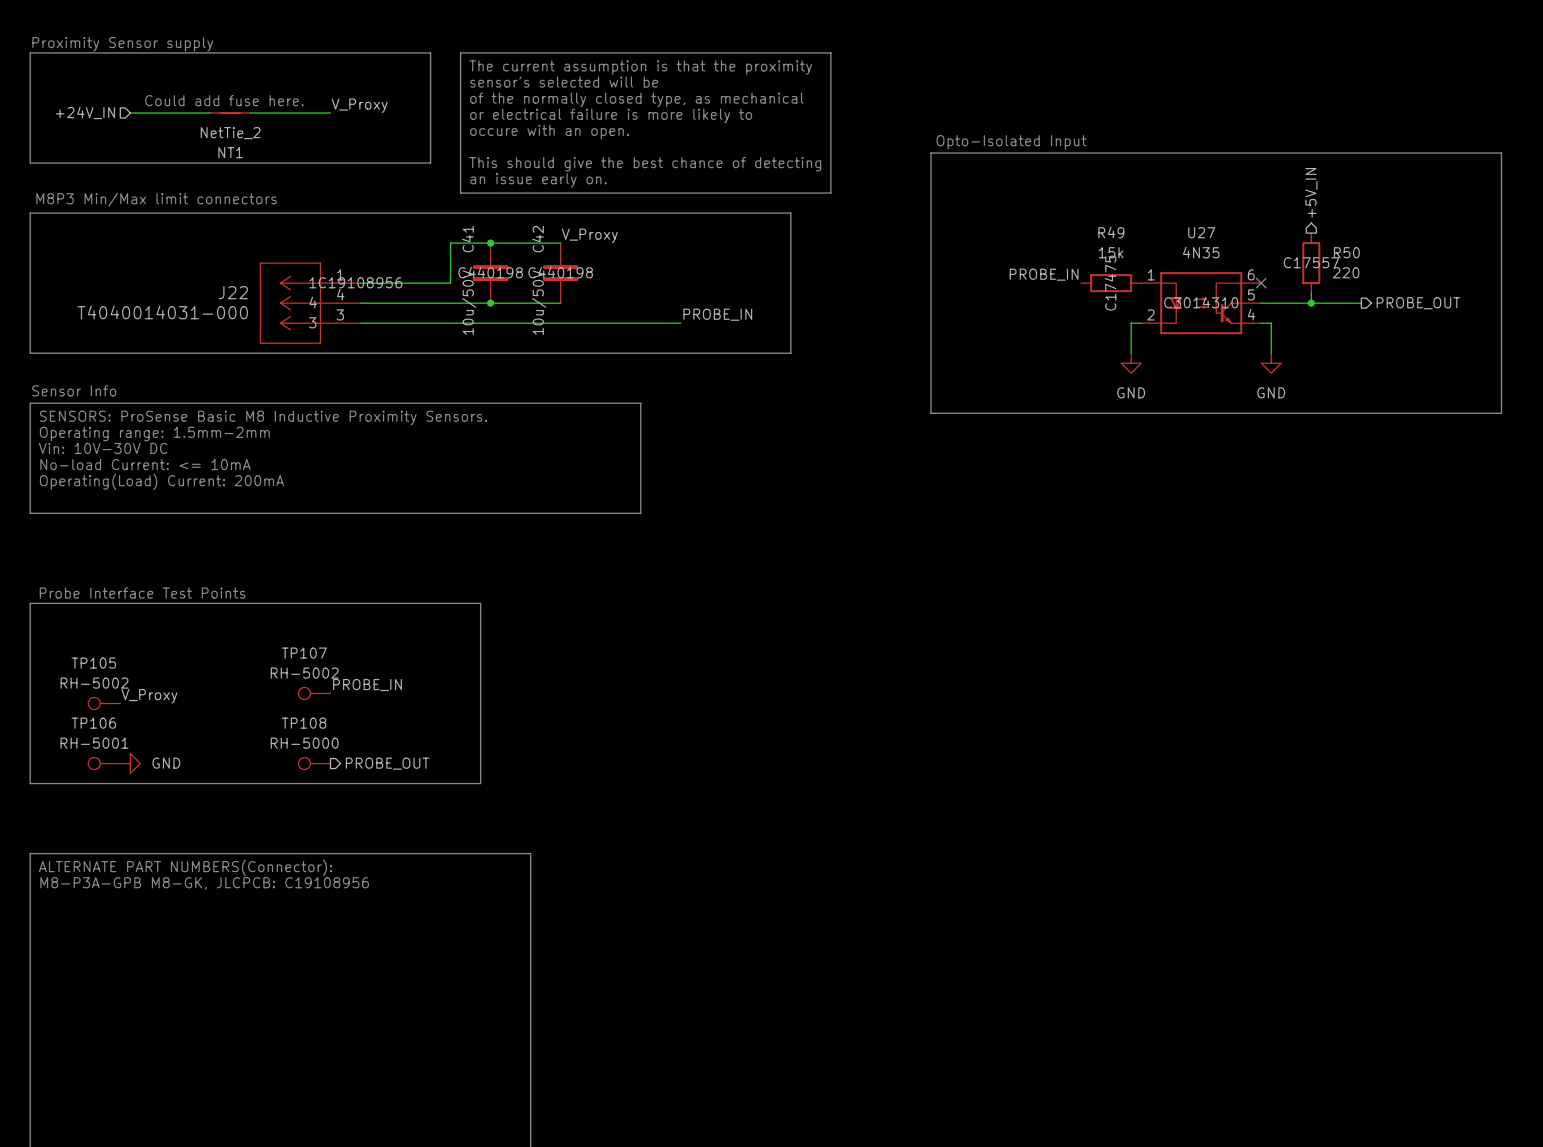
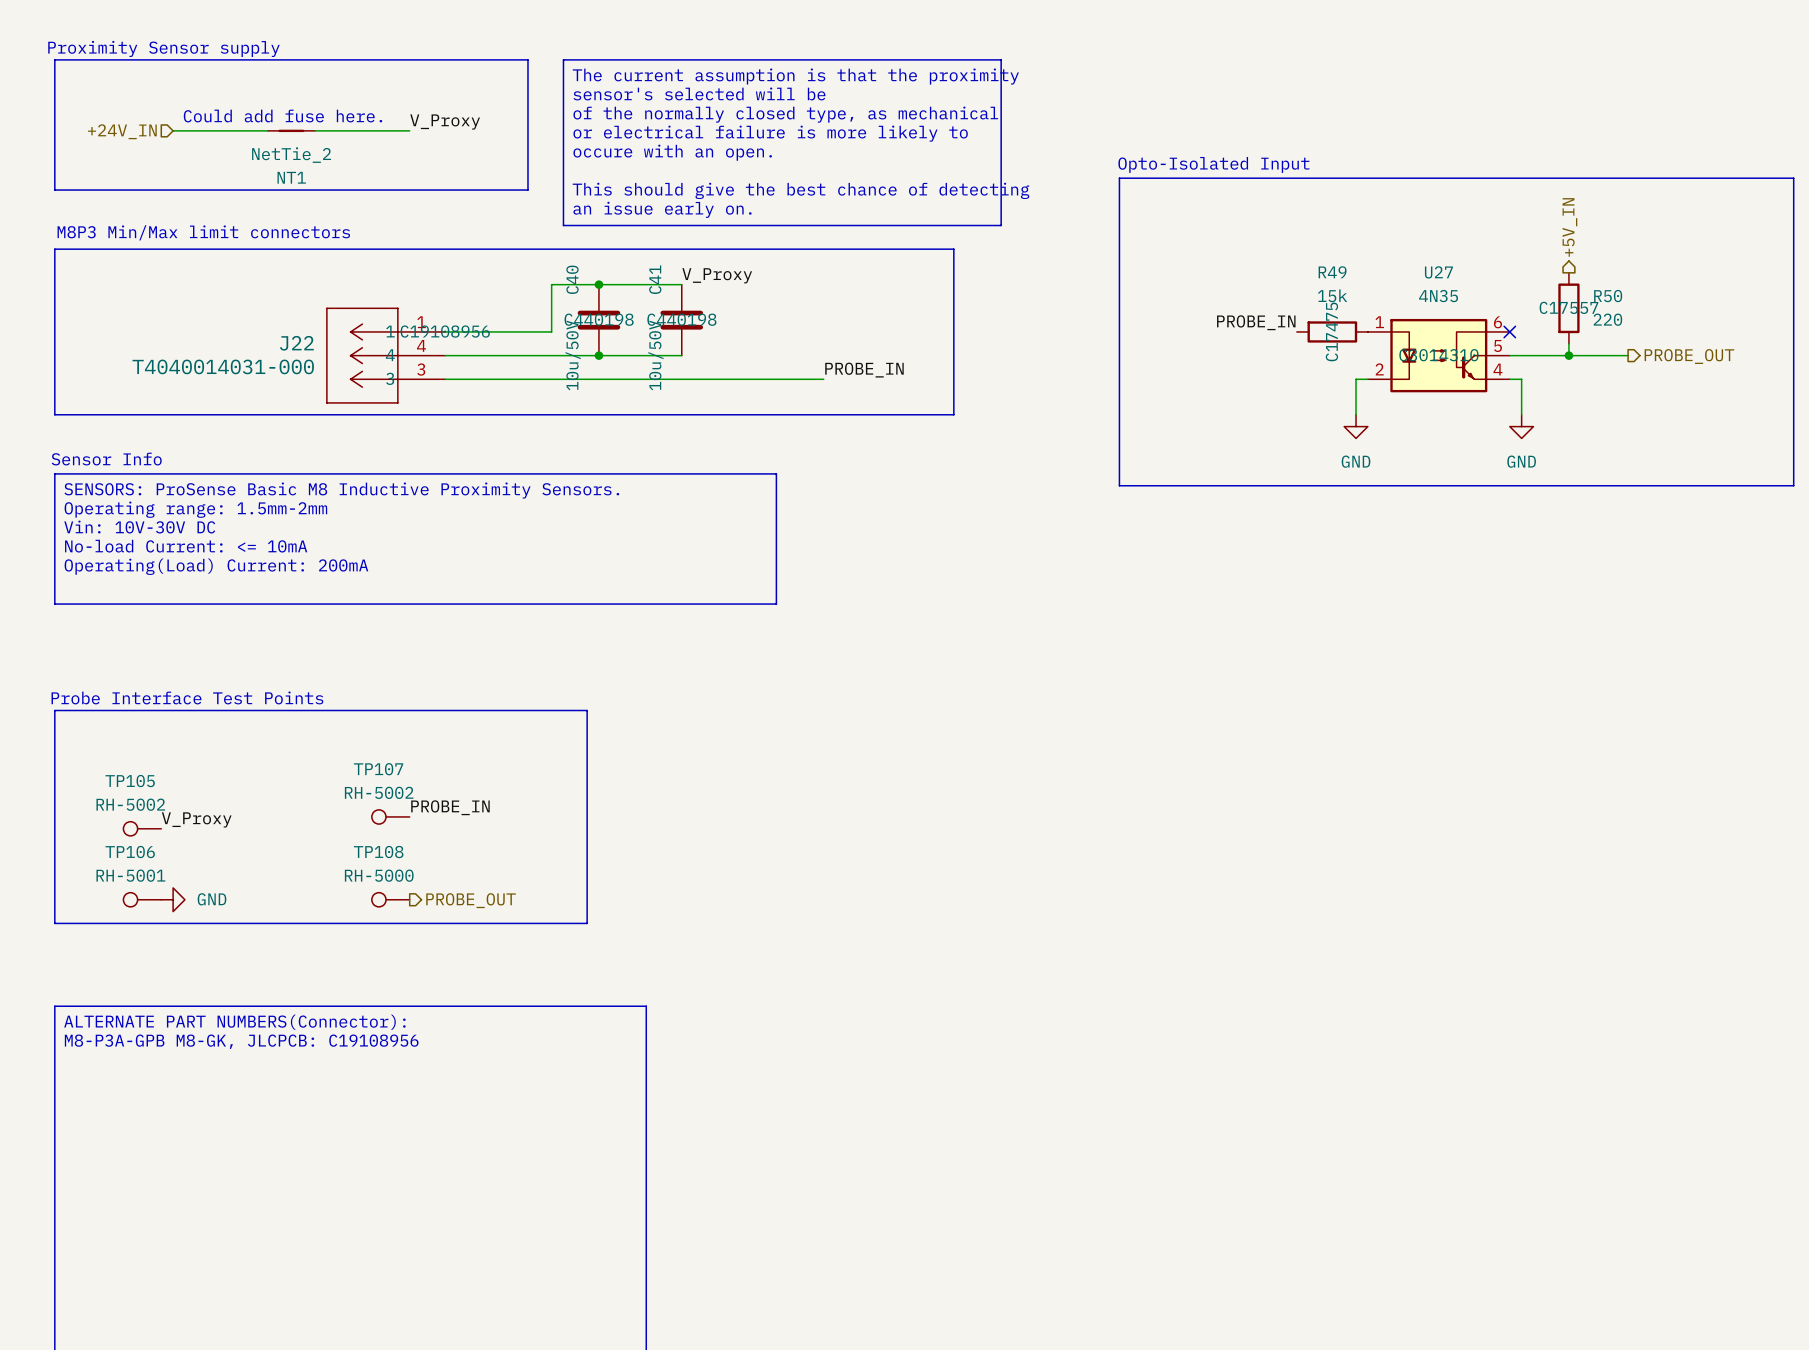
C41 name: C41 (467, 239) -> C40 (572, 279)
C42 name: C42 (538, 239) -> C41 (655, 279)

